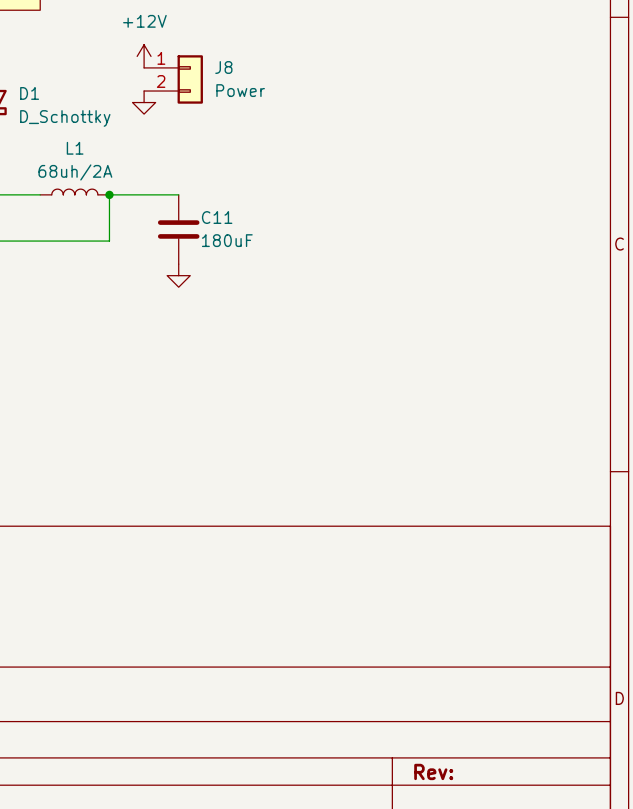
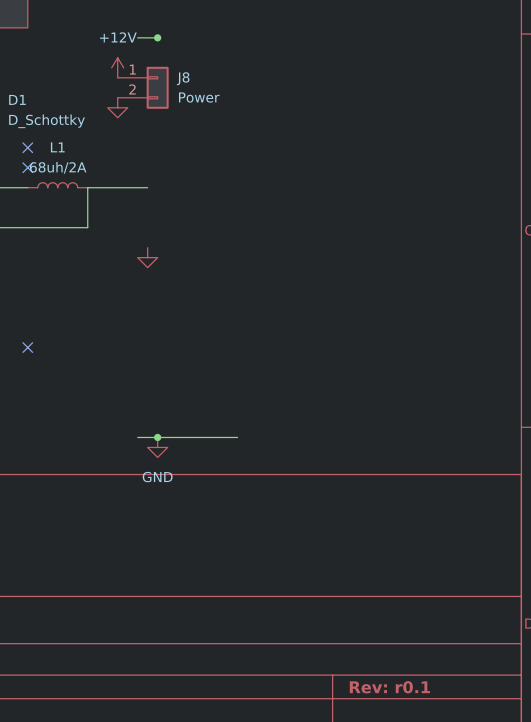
wire: none -> (137, 37) (157, 37)
junction: none -> (157, 37)
no-connect mark: none -> (27, 147)
no-connect mark: none -> (27, 167)
junction: (109, 194) -> none
C11: 180uF (178, 229) -> none
no-connect mark: none -> (27, 347)
wire: none -> (137, 437) (237, 437)
junction: none -> (157, 437)
power symbol: none -> GND (157, 447)
title block: Rev: (433, 771) -> Rev: r0.1 (389, 687)

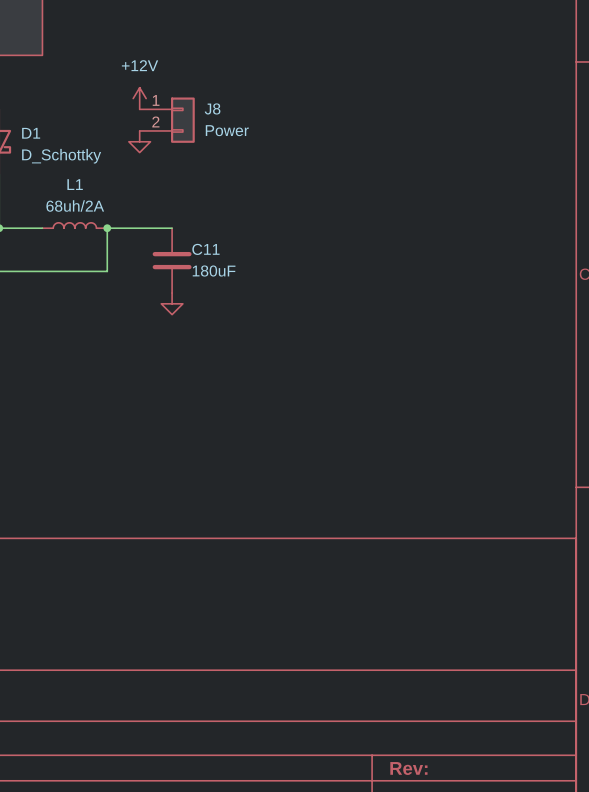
wire: (137, 37) (157, 37) -> none
junction: (157, 37) -> none
no-connect mark: (27, 147) -> none
no-connect mark: (27, 167) -> none
junction: none -> (107, 228)
C11: none -> 180uF (172, 260)
no-connect mark: (27, 347) -> none
wire: (137, 437) (237, 437) -> none
junction: (157, 437) -> none
power symbol: GND (157, 447) -> none
title block: Rev: r0.1 (389, 687) -> Rev: (408, 768)

